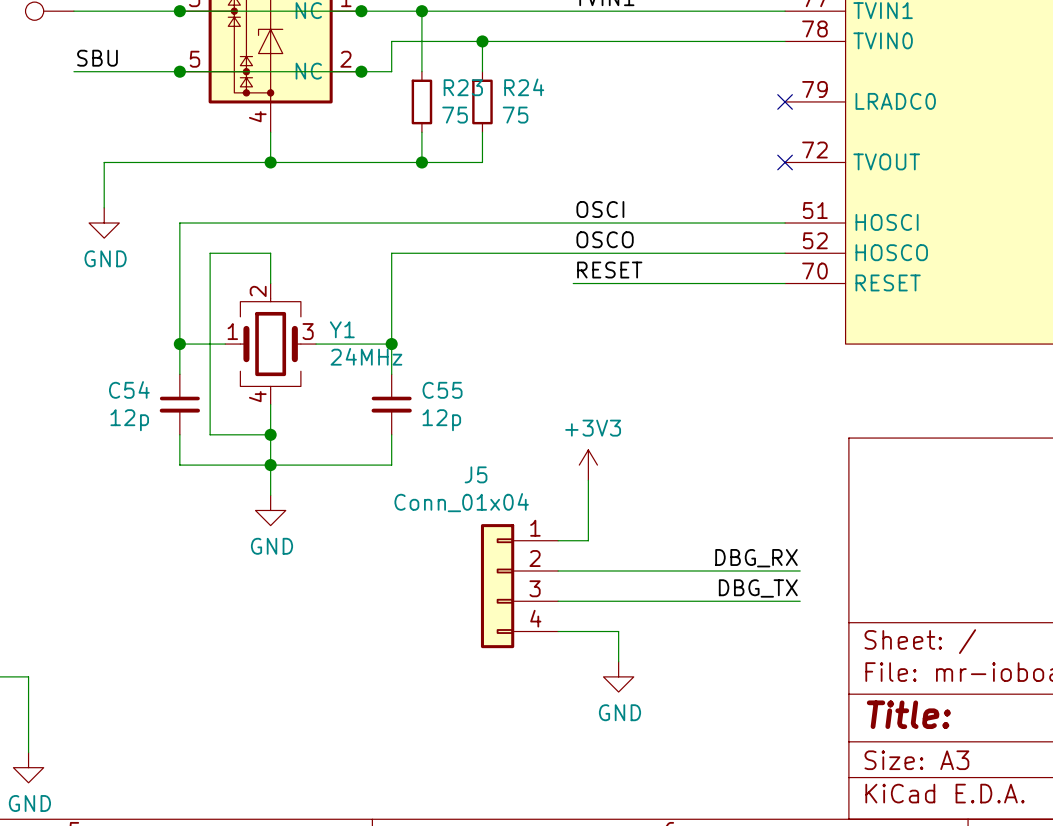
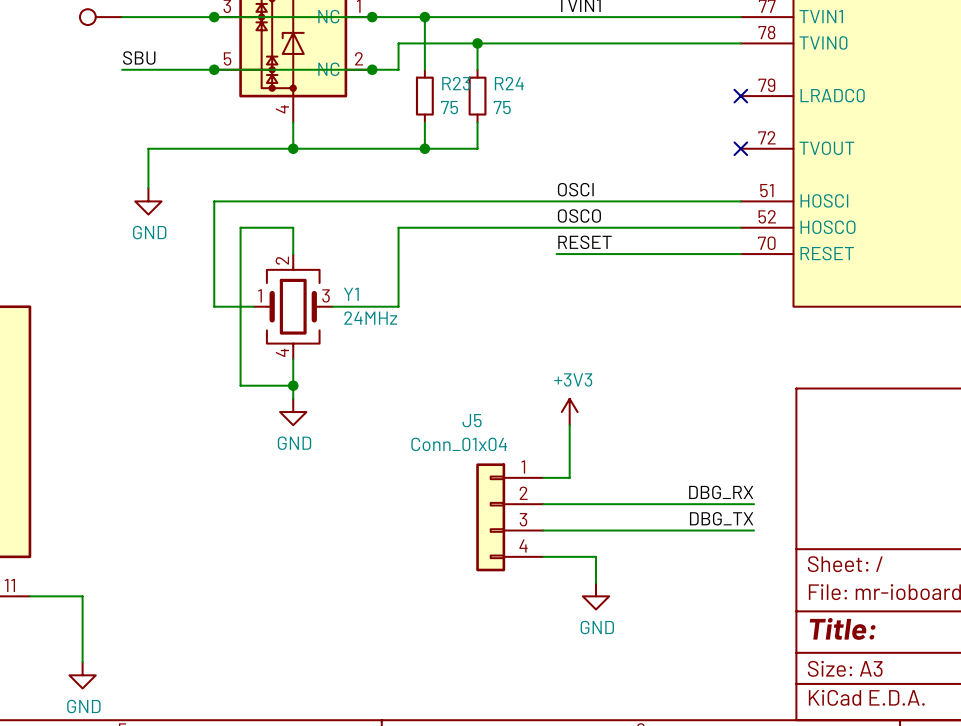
wire: (179, 344) (179, 374) -> none
junction: (179, 344) -> none
wire: (391, 344) (391, 374) -> none
junction: (391, 344) -> none
C54: 12p (179, 404) -> none
C55: 12p (391, 404) -> none
wire: (179, 434) (179, 465) (391, 465) (391, 434) -> none
wire: (270, 449) (270, 495) -> none
junction: (270, 465) -> none
power symbol position: GND (270, 510) -> GND (293, 412)

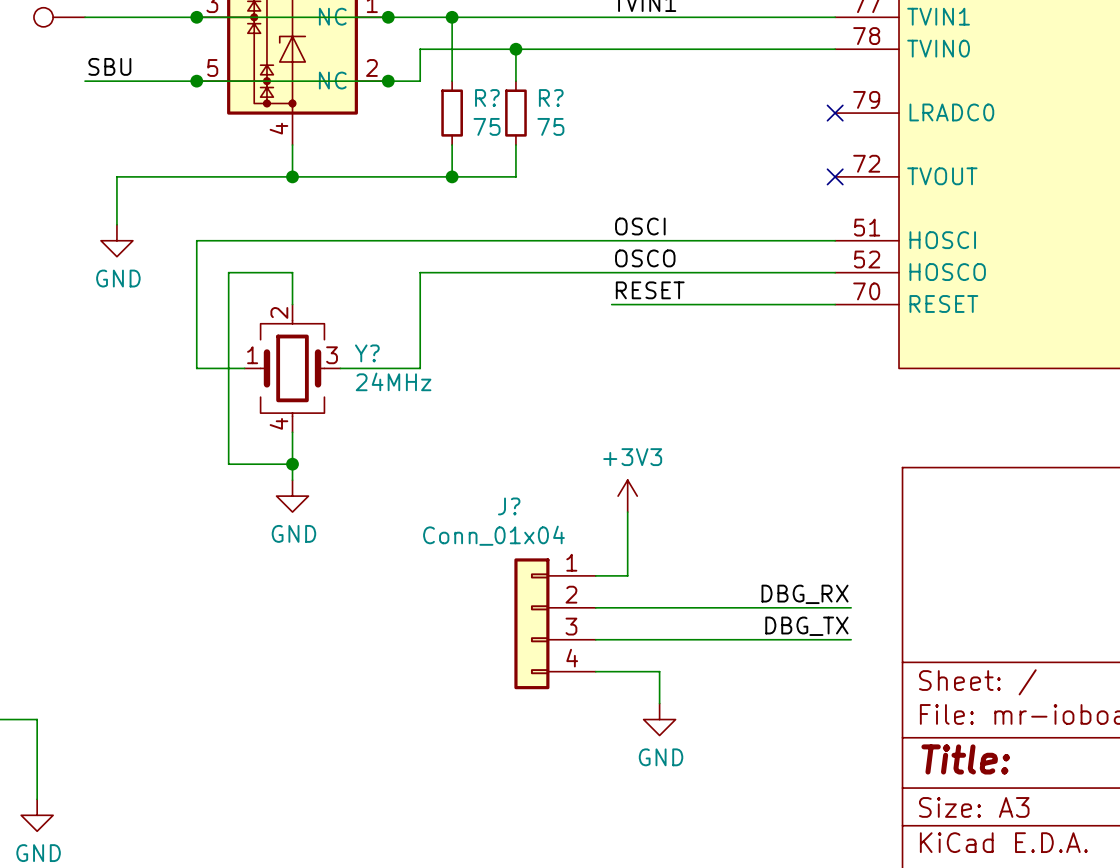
R23 name: R23 (456, 83) -> R? (487, 98)
R24 name: R24 (509, 83) -> R? (551, 98)
Y1 name: Y1 (351, 294) -> Y? (367, 353)
J5 name: J5 (472, 420) -> J? (509, 506)

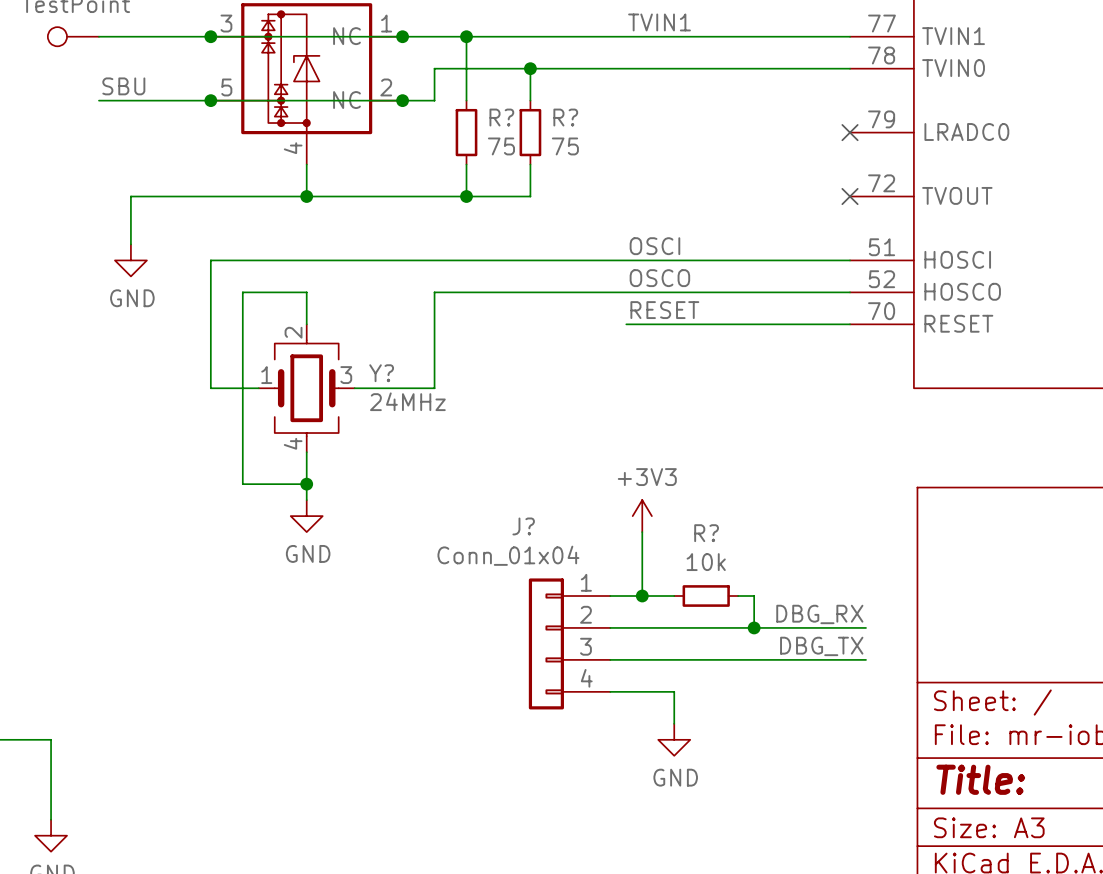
wire: none -> (642, 596) (674, 596)
junction: none -> (642, 596)
R?: none -> 10k (706, 596)
wire: none -> (738, 596) (754, 596) (754, 627)
junction: none -> (754, 627)

